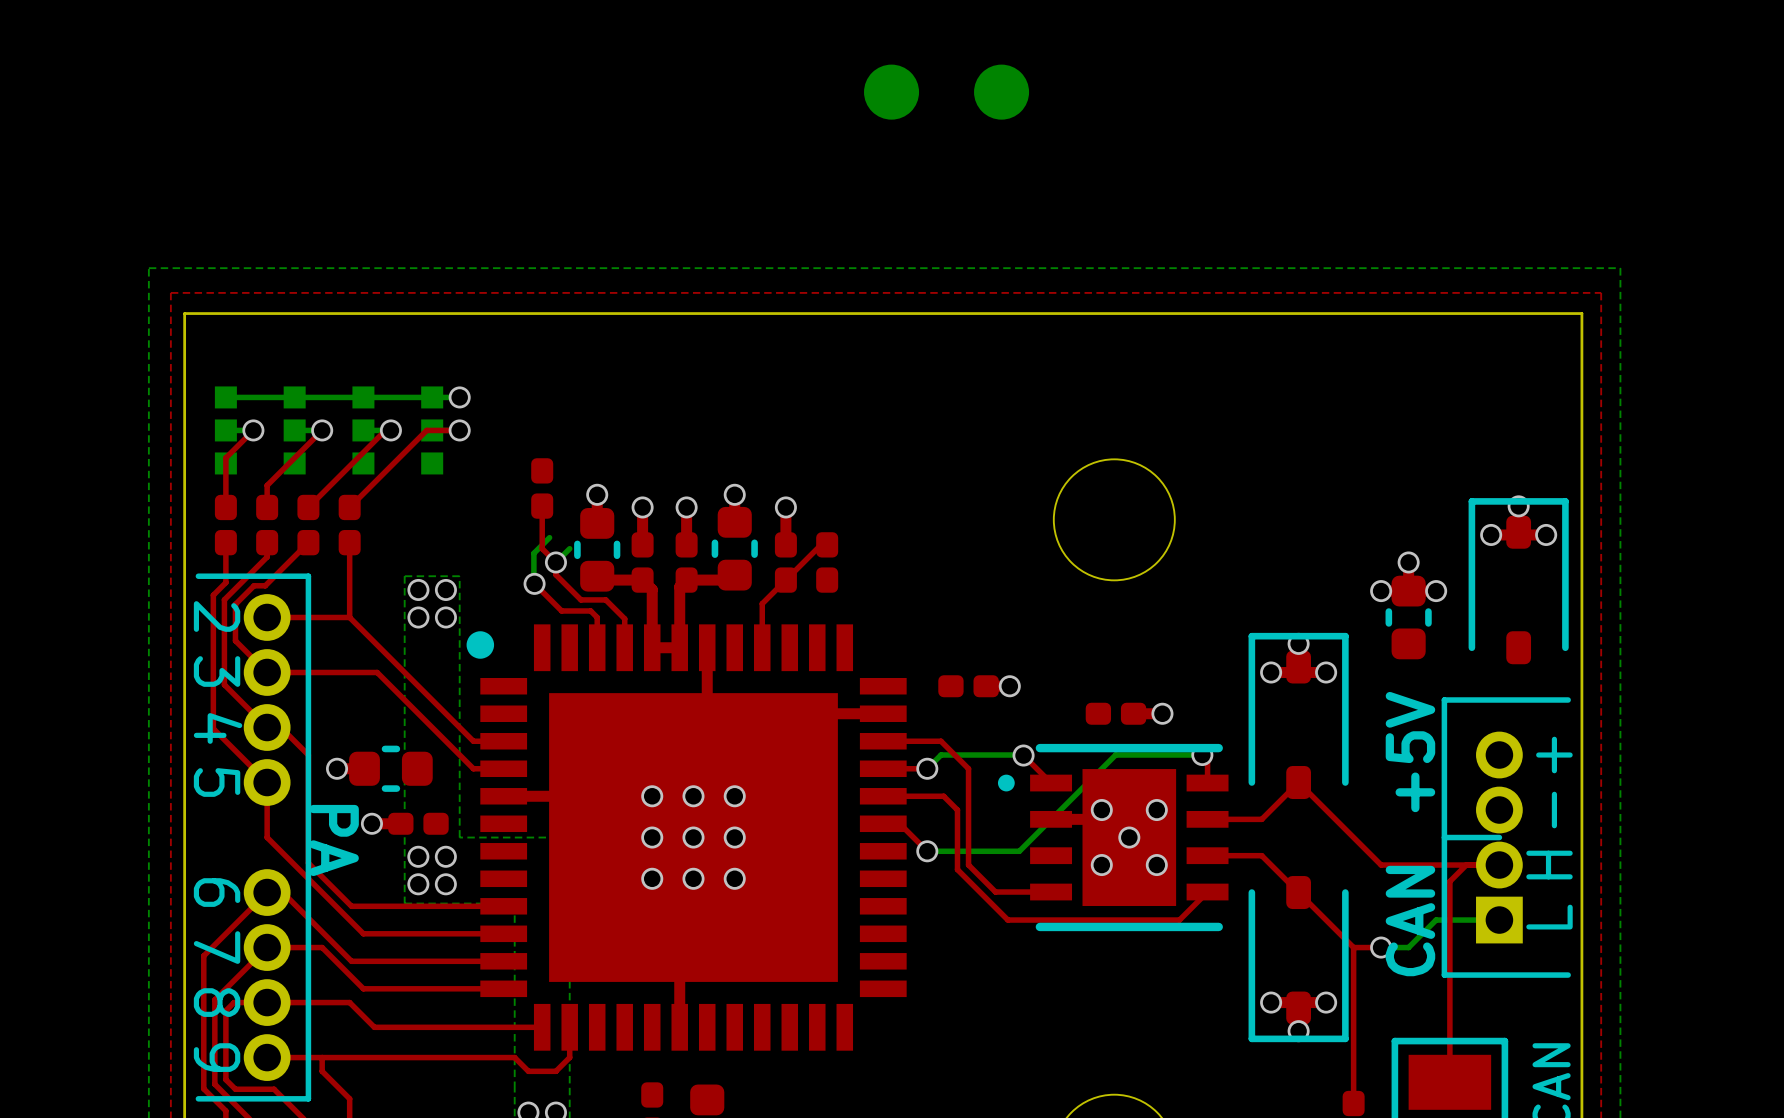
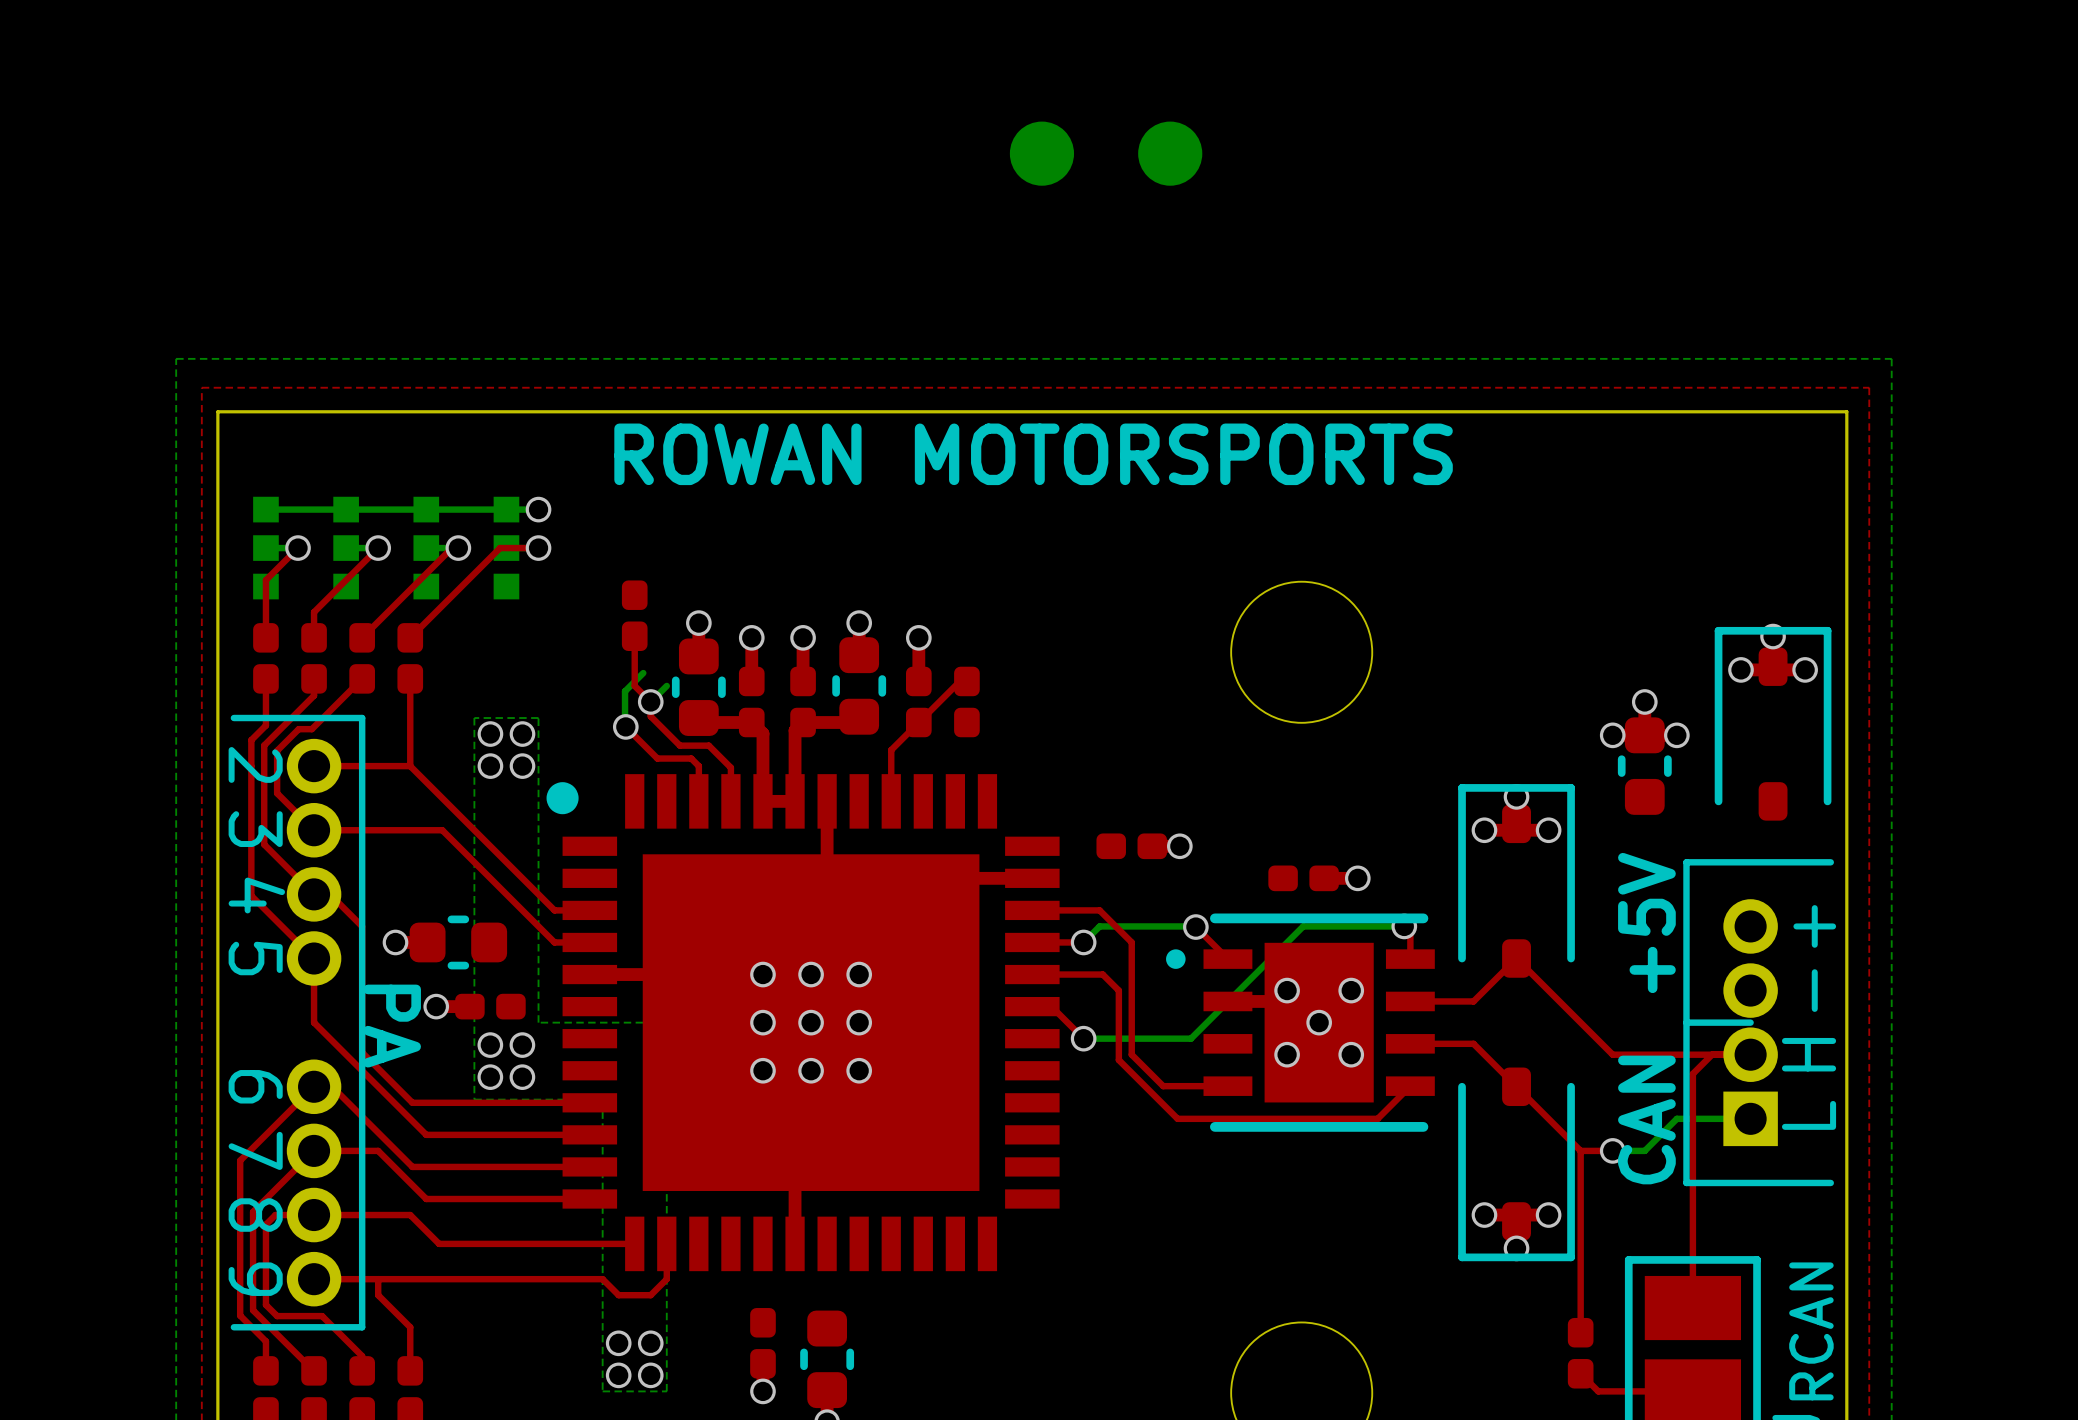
text: none -> ROWAN MOTORSPORTS (1033, 454)

